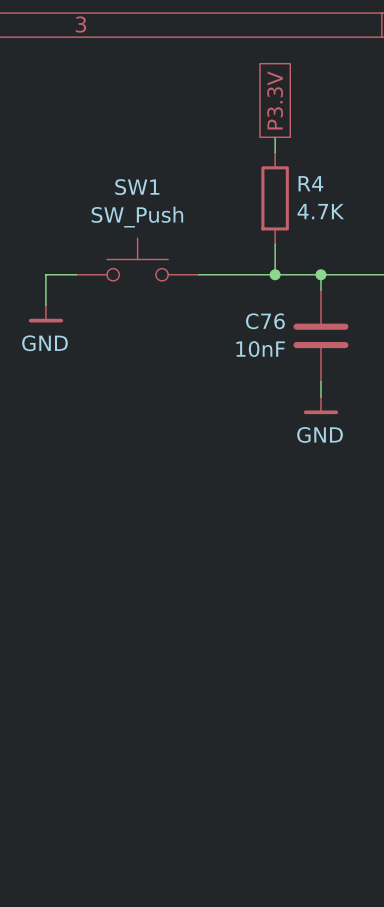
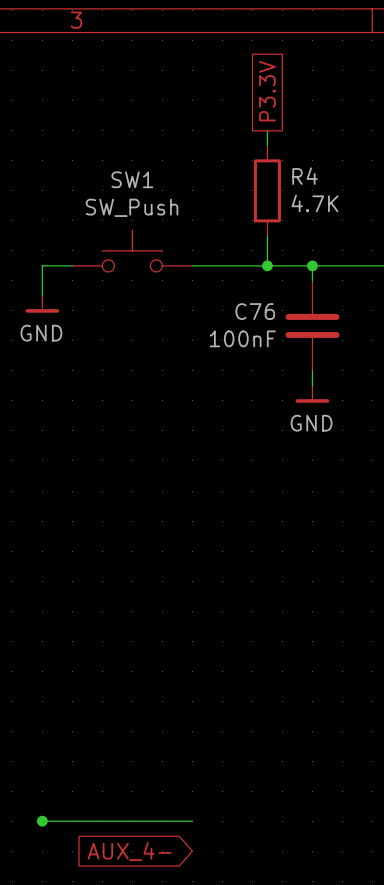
C76 value: 10nF (260, 349) -> 100nF (242, 338)
wire: none -> (42, 821) (192, 821)
junction: none -> (42, 821)
global label: none -> AUX_4- (129, 851)

